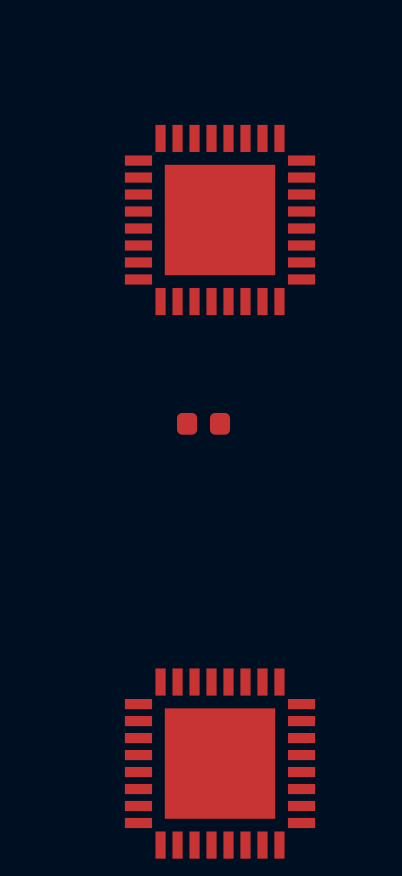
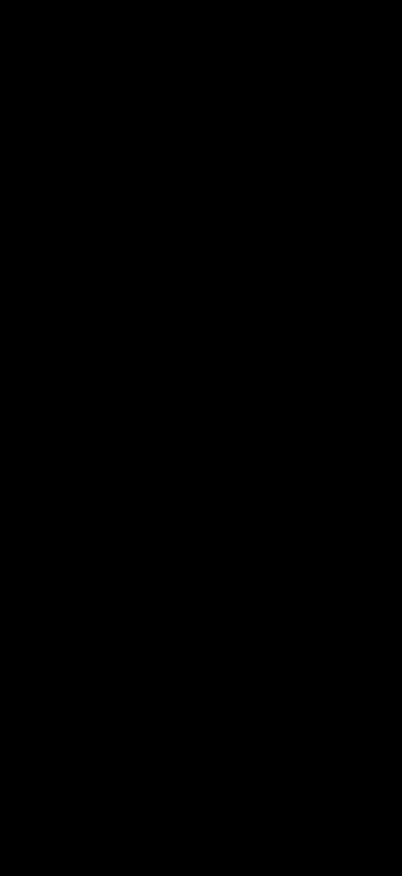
part: (220, 220) -> none
part: (203, 423) -> none
part: (220, 763) -> none

